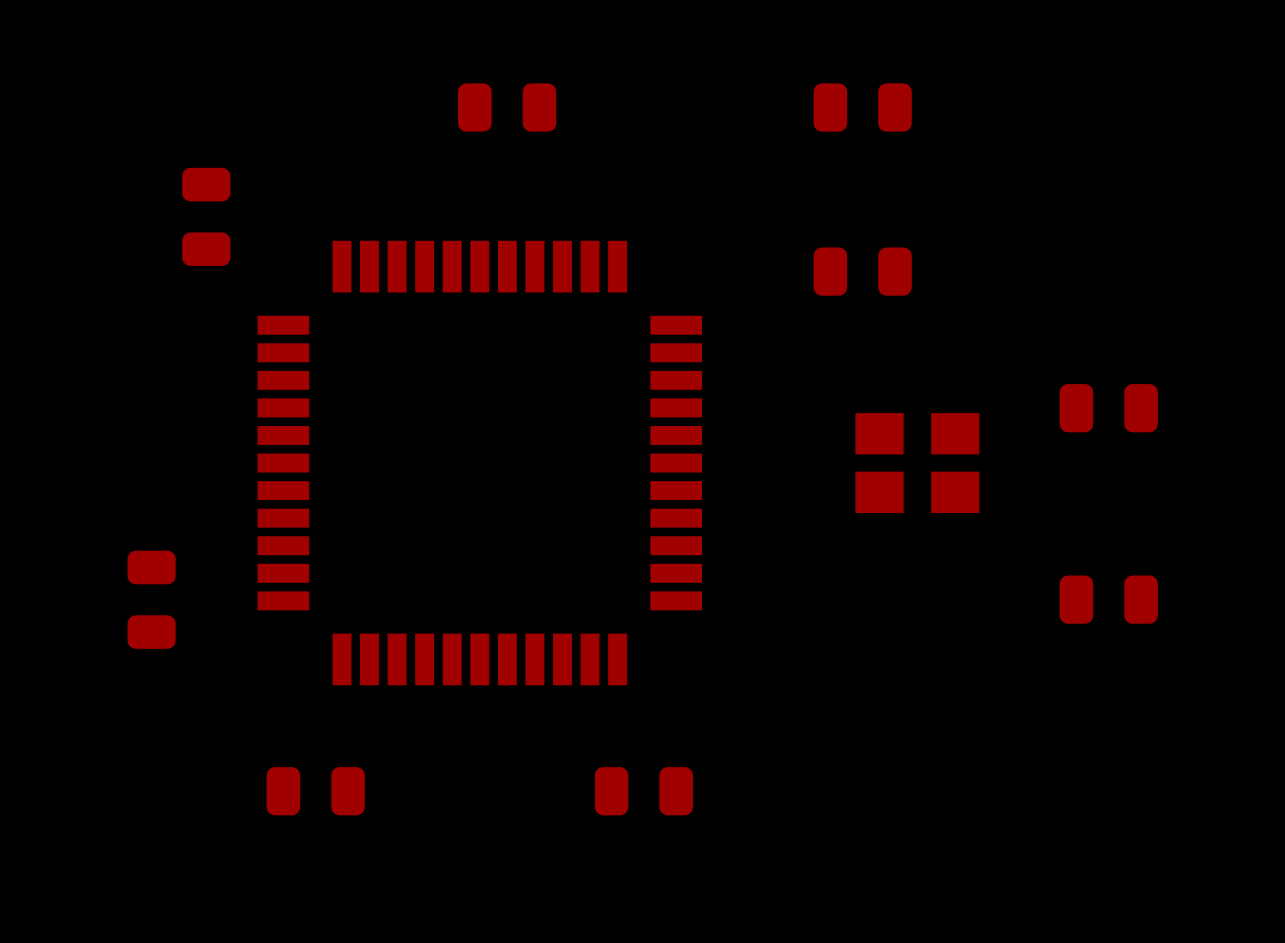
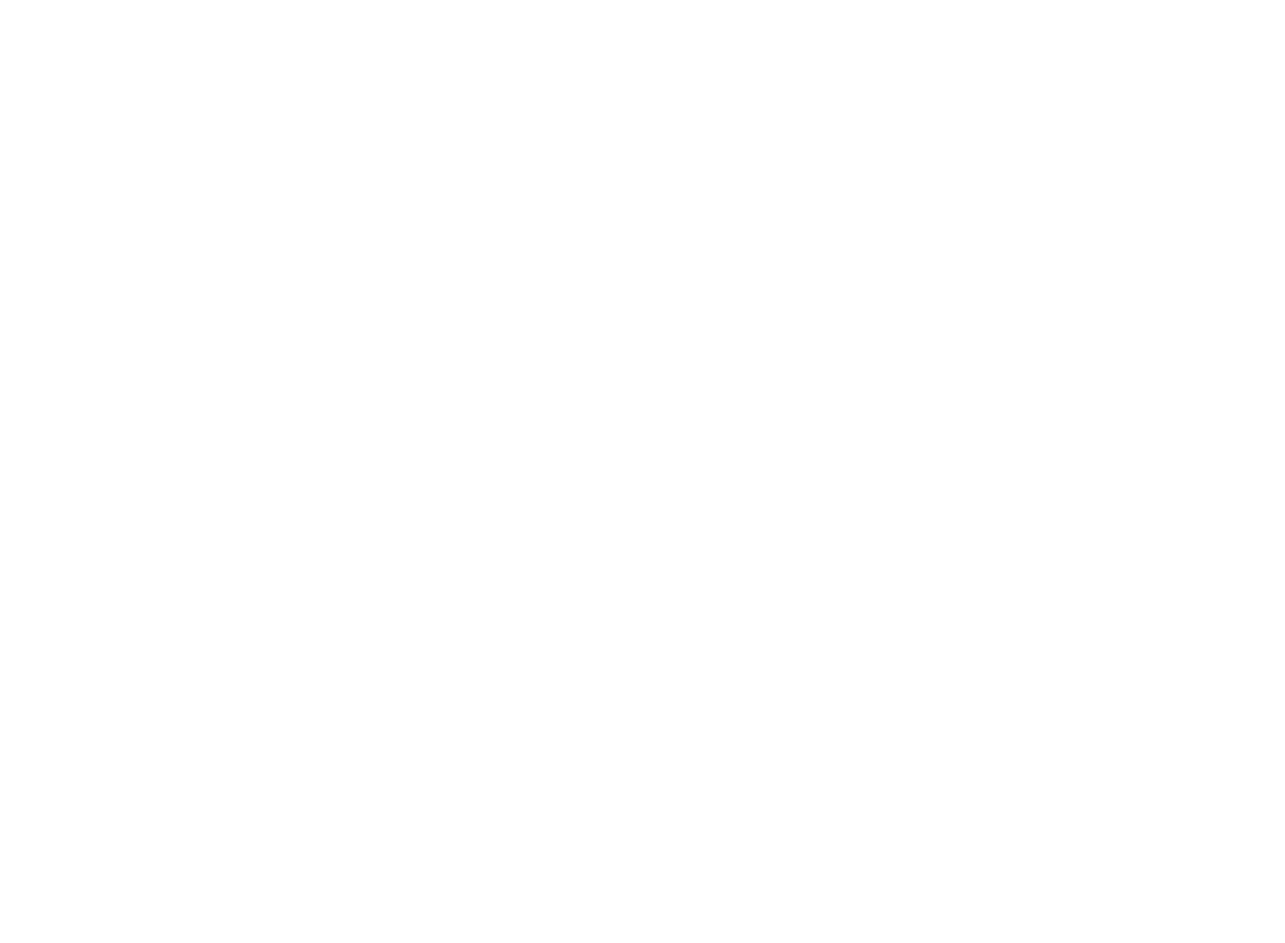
part: (507, 107) -> none
part: (862, 107) -> none
part: (206, 216) -> none
part: (862, 271) -> none
part: (1108, 408) -> none
part: (479, 463) -> none
part: (917, 463) -> none
part: (151, 599) -> none
part: (1108, 599) -> none
part: (315, 791) -> none
part: (643, 791) -> none

